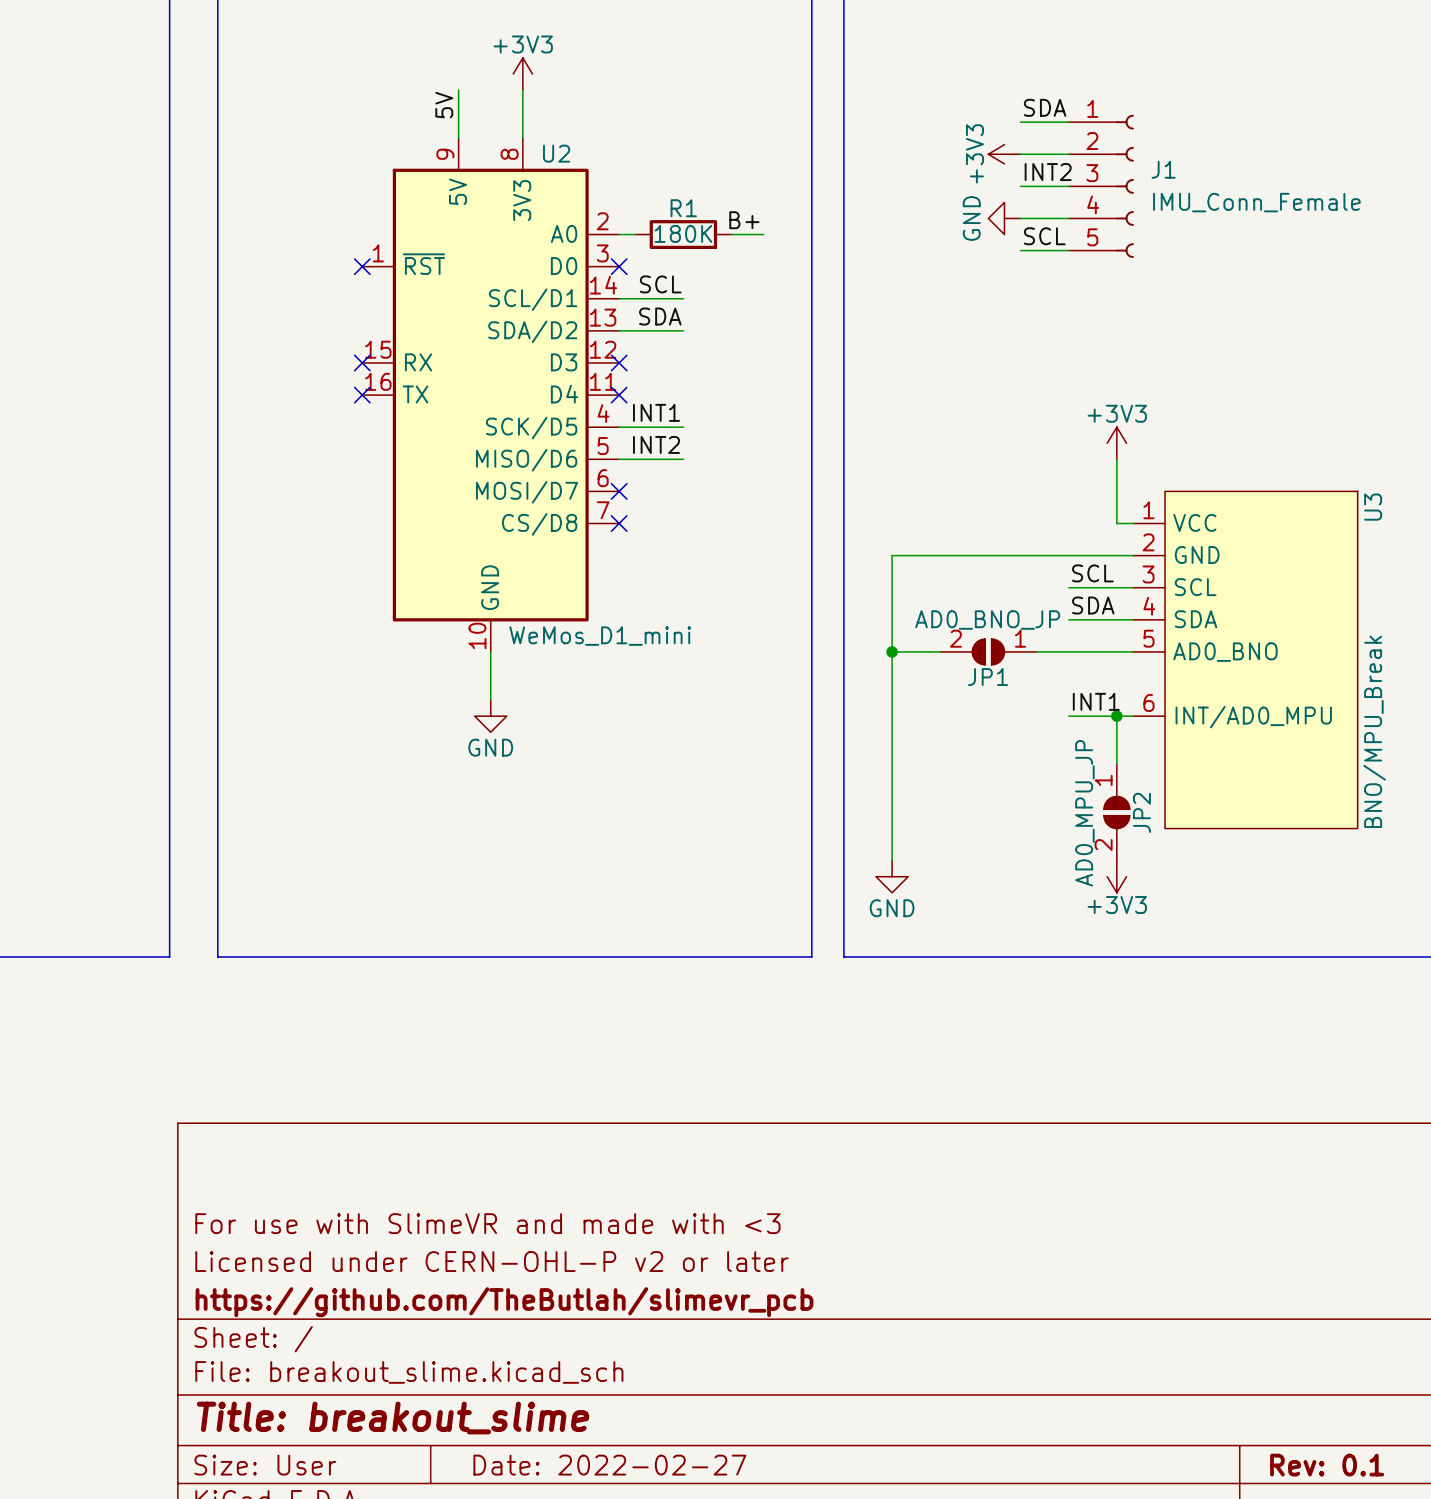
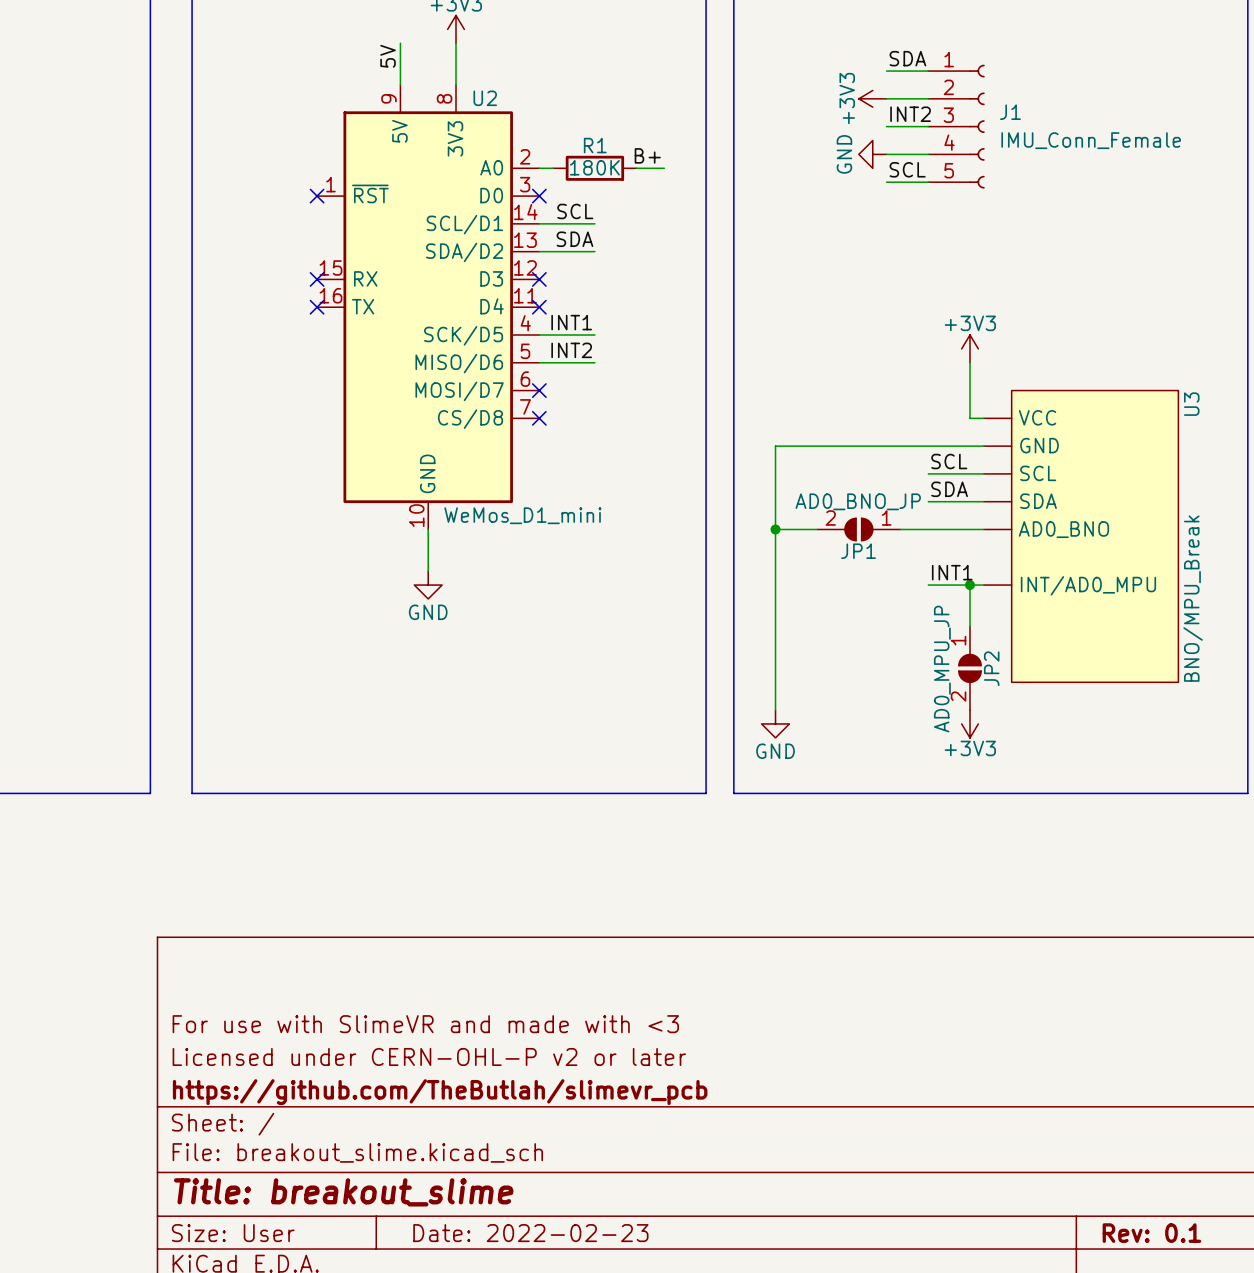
U3 pin number: 1 (1148, 510) -> none
U3 pin number: 2 (1148, 542) -> none
U3 pin number: 3 (1148, 574) -> none
U3 pin number: 4 (1149, 606) -> none
U3 pin number: 5 (1148, 638) -> none
U3 pin number: 6 (1148, 702) -> none
title block: Date: 2022-02-27 (609, 1465) -> Date: 2022-02-23 (530, 1233)

